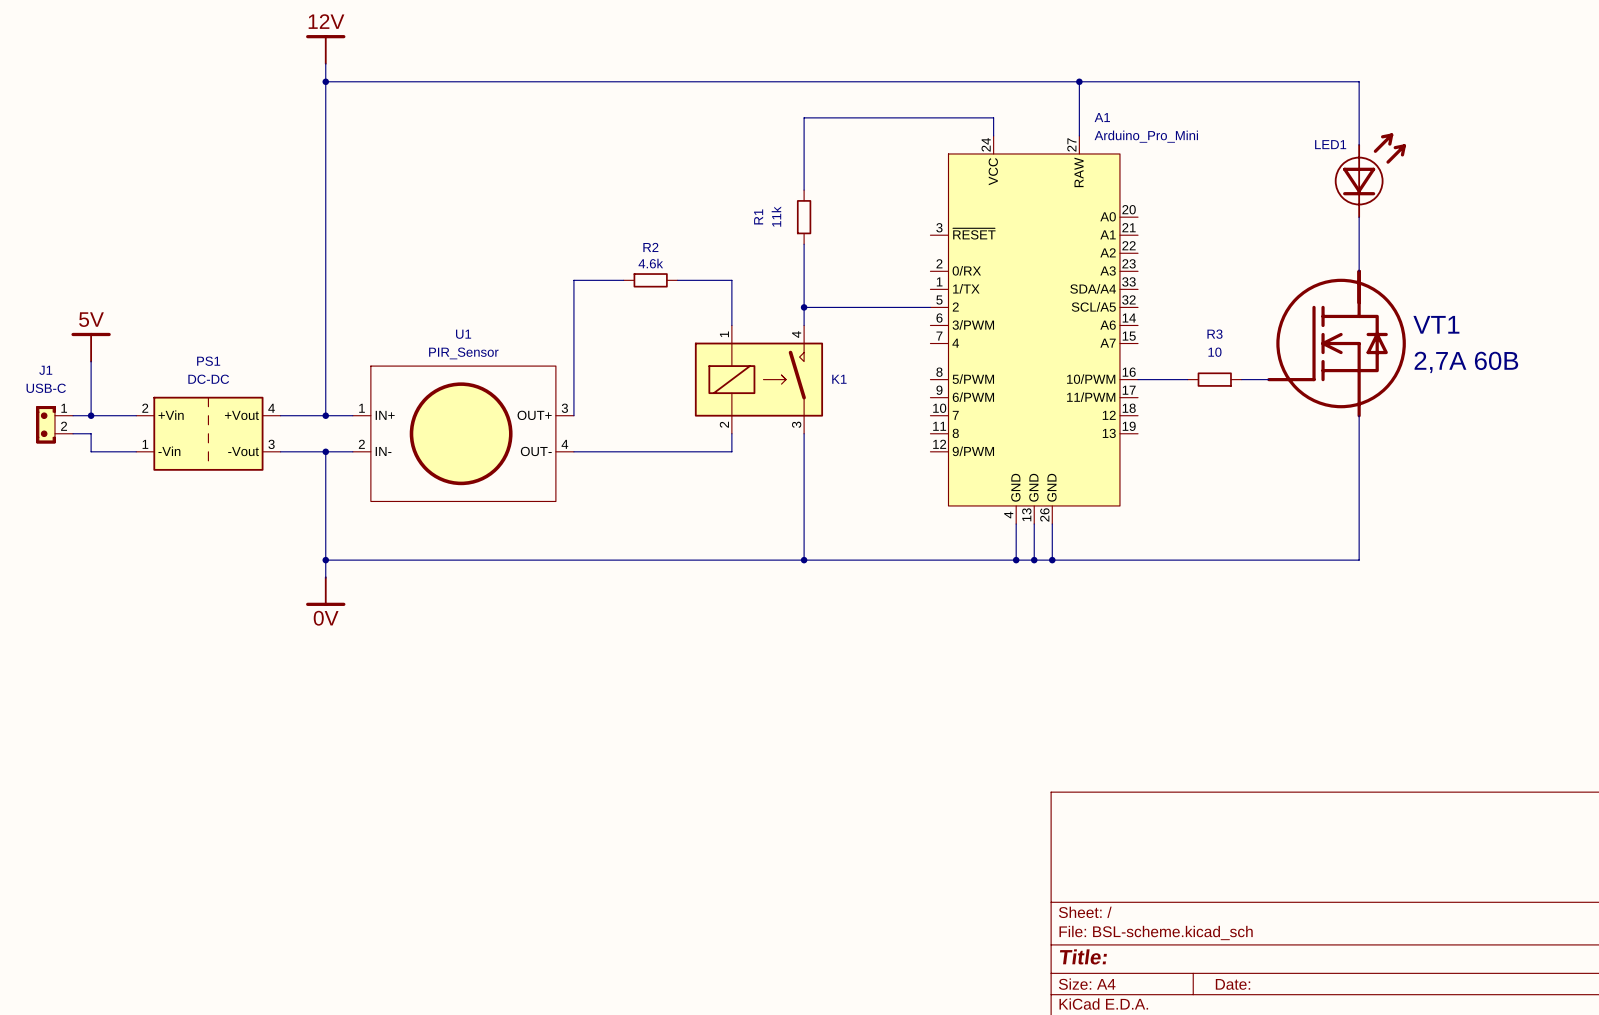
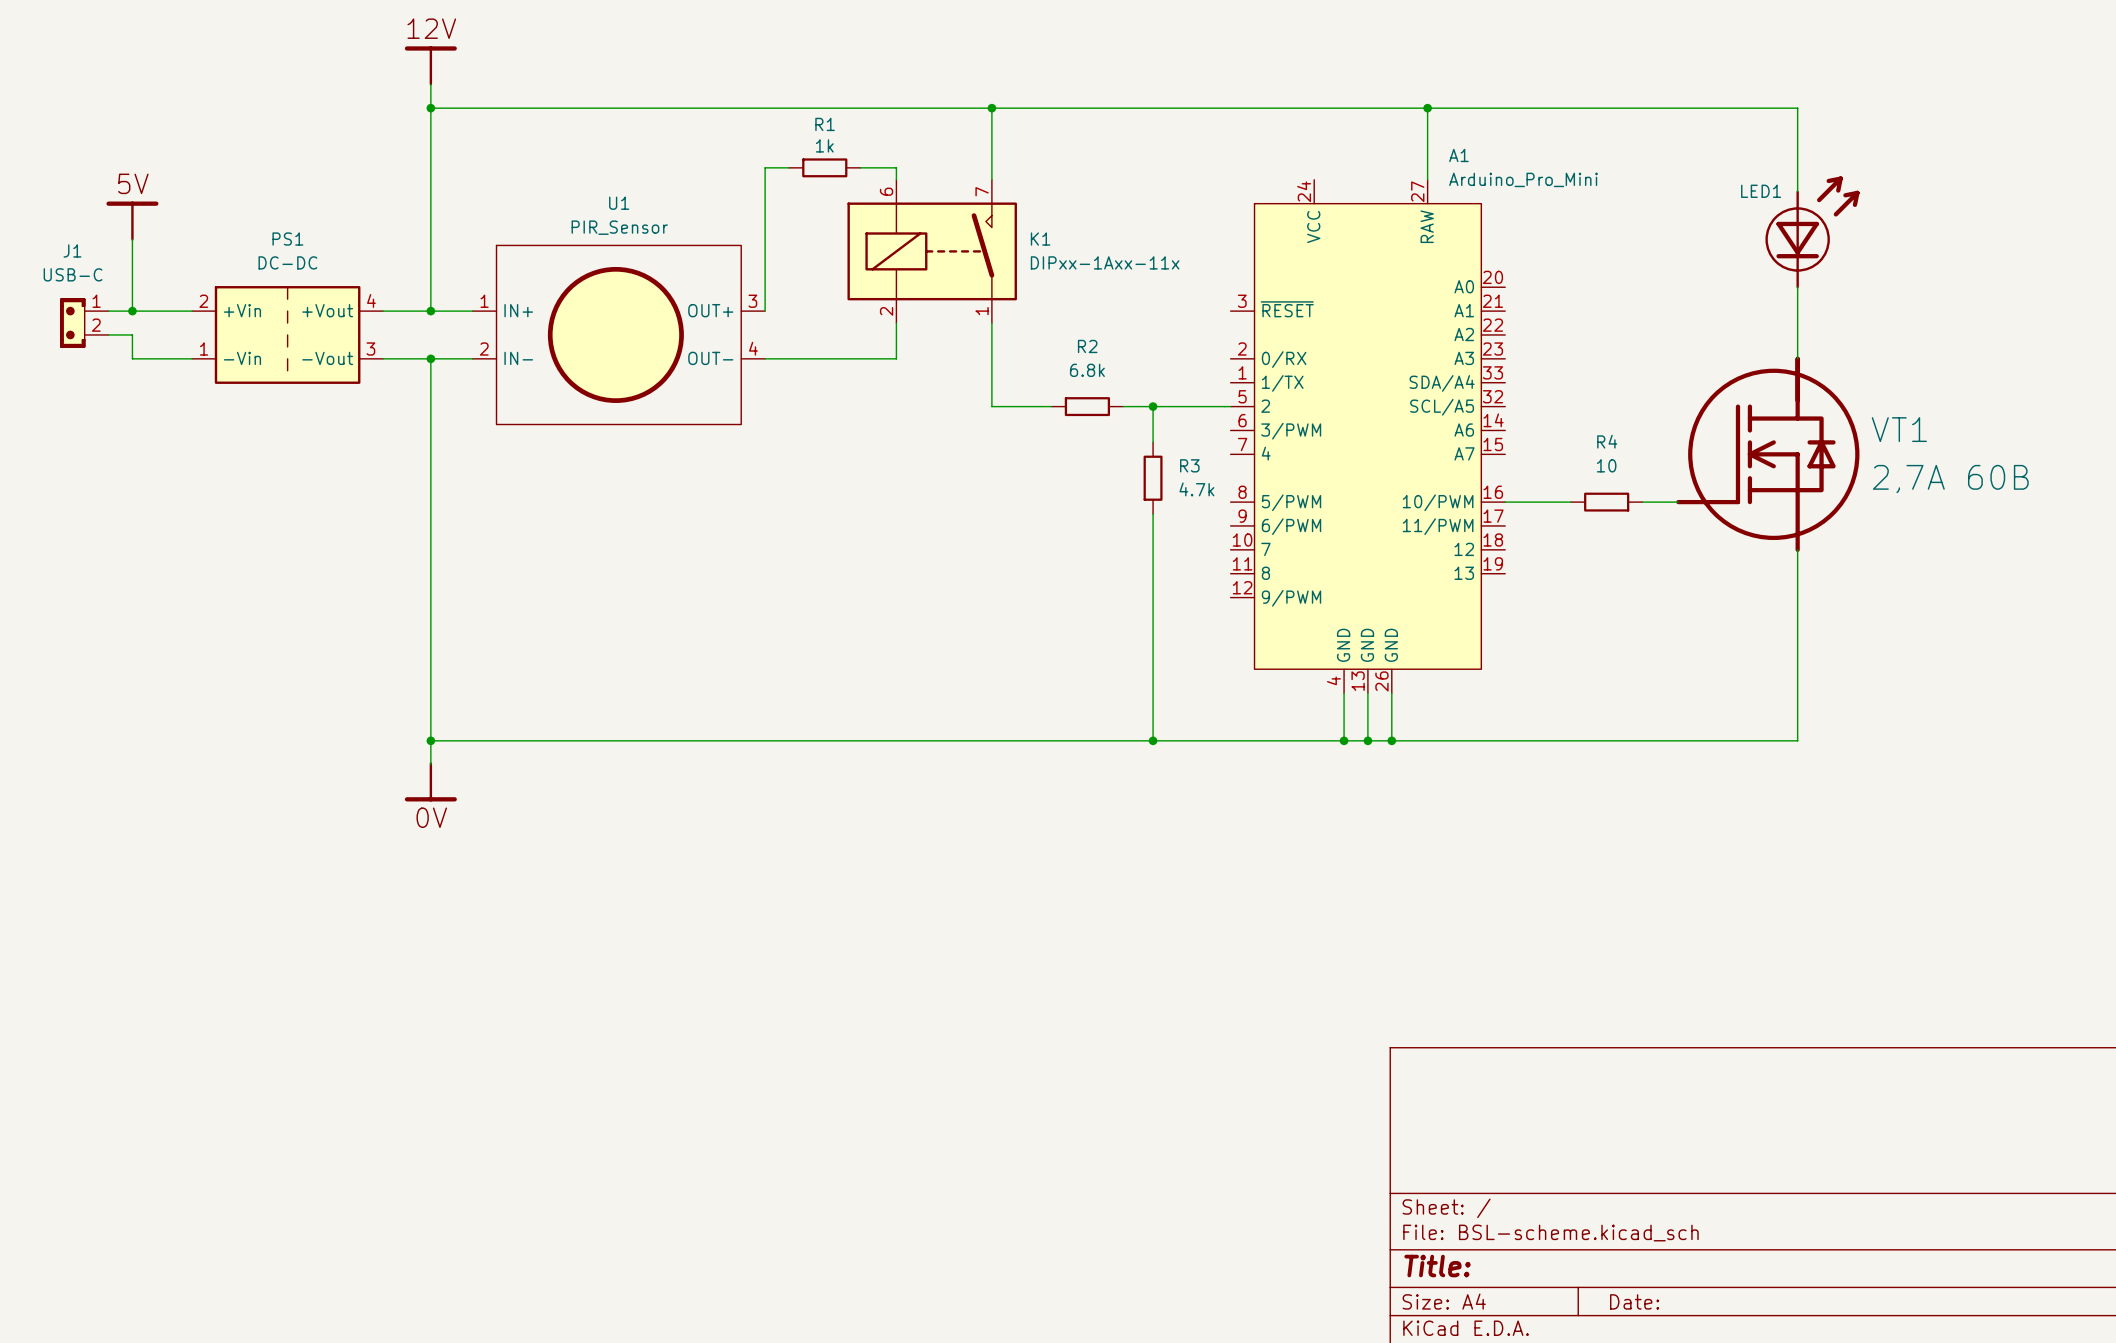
wire: none -> (991, 108) (991, 179)
junction: none -> (991, 108)
wire: none -> (788, 167) (765, 167) (765, 311)
wire: none -> (860, 167) (896, 167) (896, 179)
wire: (993, 135) (993, 117) (804, 117) (804, 190) -> none
power symbol: none -> (132, 221)
wire: none -> (132, 239) (132, 311)
K1 value: none -> DIPxx-1Axx-11x (1105, 262)
R1 value: 11k (776, 216) -> 1k (824, 145)
R1 rotation: 0° (804, 217) -> 90° clockwise (824, 167)
R1 position: (804, 217) -> (824, 167)
wire: none -> (108, 311) (192, 311)
junction: none -> (132, 311)
wire: none -> (383, 311) (472, 311)
wire: (325, 235) (325, 271) -> none
junction: none -> (430, 311)
wire: none -> (896, 323) (896, 358) (765, 358)
wire: none -> (991, 323) (991, 406) (1051, 406)
wire: (804, 244) (804, 325) -> none
R2 name position: R2 (650, 247) -> R2 (1087, 346)
wire: none -> (108, 334) (132, 334) (132, 358) (192, 358)
R2 value: 4.6k (650, 263) -> 6.8k (1087, 370)
wire: none -> (383, 358) (472, 358)
junction: none -> (430, 358)
wire: (623, 280) (573, 280) (573, 415) -> none
R2 position: (650, 280) -> (1087, 406)
wire: (677, 280) (731, 280) (731, 325) -> none
wire: (804, 307) (849, 307) -> none
junction: (804, 307) -> none
wire: none -> (1153, 406) (1153, 442)
junction: none -> (1153, 406)
K1 symbol: [694, 325, 824, 434] -> [847, 179, 1017, 324]
R3 name: R3 (1214, 334) -> R4 (1607, 441)
power symbol: (91, 347) -> none
wire: (91, 361) (91, 415) -> none
R3: none -> 4.7k (1153, 478)
wire: none -> (1153, 514) (1153, 740)
wire: (73, 415) (136, 415) -> none
junction: (91, 415) -> none
wire: (280, 415) (352, 415) -> none
wire: none -> (430, 549) (430, 597)
junction: (325, 415) -> none
J1 position: (55, 424) -> (84, 323)
wire: (73, 433) (91, 433) (91, 451) (136, 451) -> none
PS1 position: (208, 433) -> (287, 334)
U1 position: (463, 433) -> (618, 334)
wire: (731, 433) (731, 451) (573, 451) -> none
wire: (804, 433) (804, 560) -> none
wire: (280, 451) (352, 451) -> none
junction: (325, 451) -> none
junction: (804, 560) -> none
junction: none -> (1153, 740)

